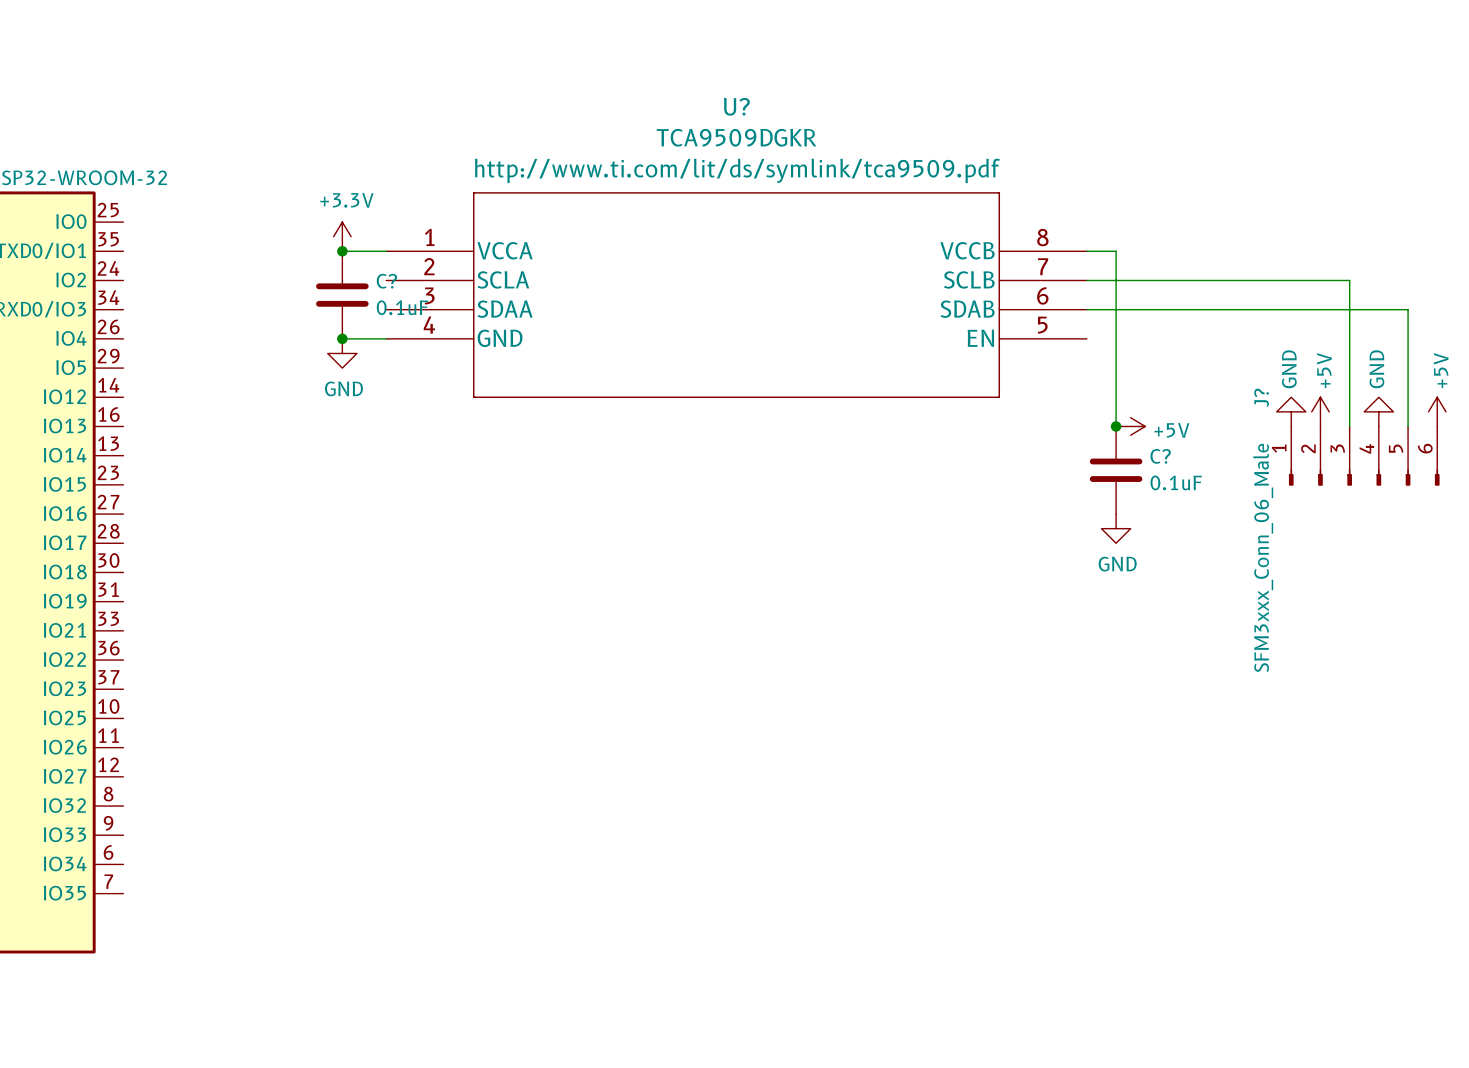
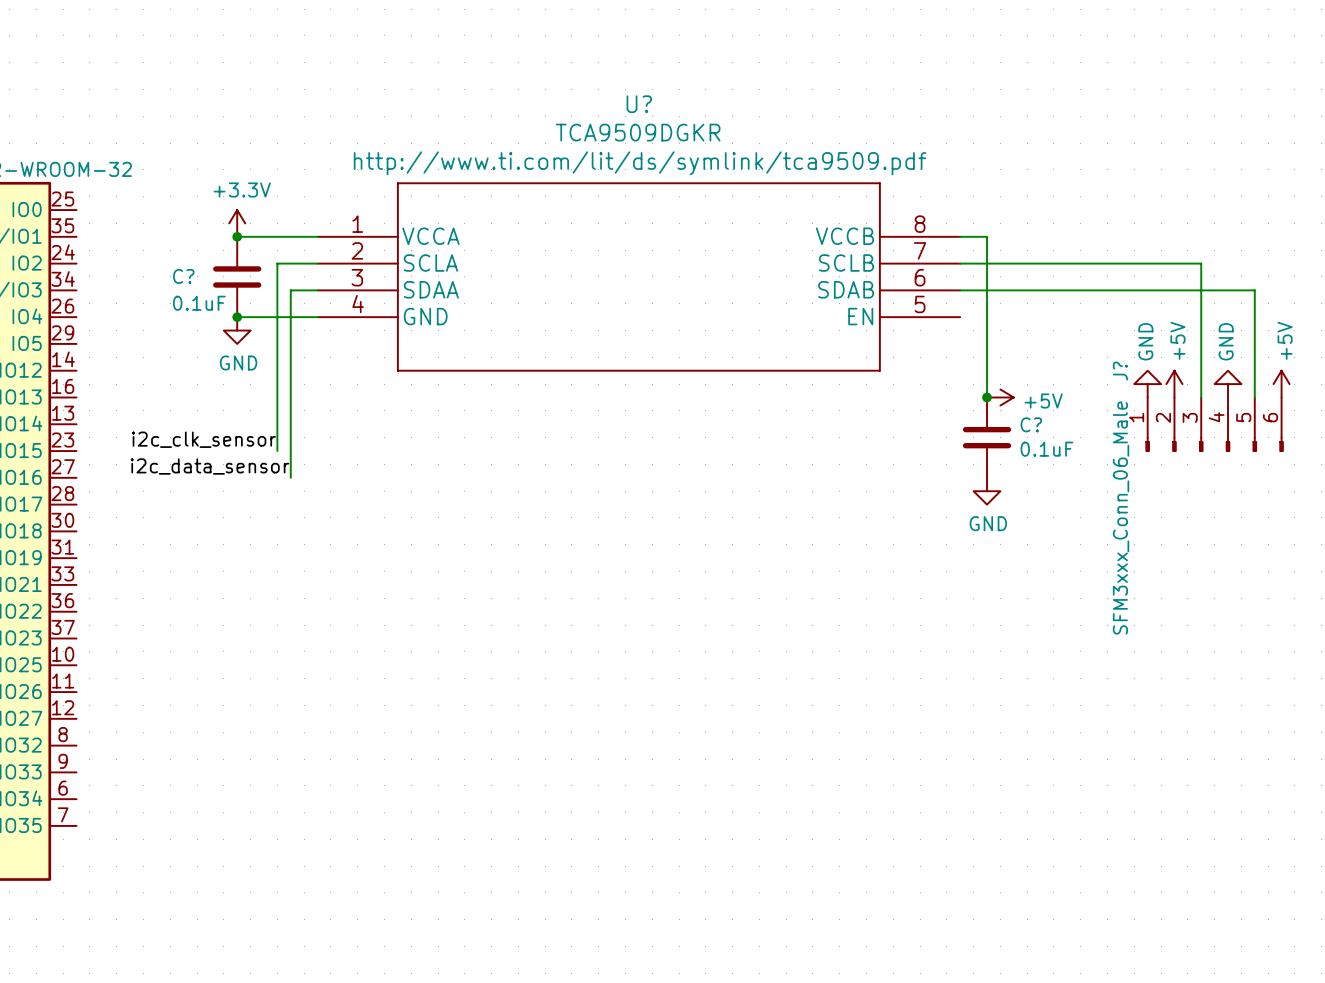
power symbol position: +3.3V (342, 236) -> +3.3V (237, 223)
wire: none -> (237, 236) (277, 236)
junction position: (342, 251) -> (237, 236)
wire: none -> (317, 263) (277, 263) (277, 451)
C? name position: C? (386, 281) -> C? (183, 276)
C? position: (342, 295) -> (237, 276)
C? value position: 0.1uF (402, 307) -> 0.1uF (199, 303)
wire: none -> (317, 290) (290, 290) (290, 477)
wire: none -> (237, 317) (277, 317)
junction position: (342, 338) -> (237, 317)
power symbol position: GND (342, 353) -> GND (237, 330)
label: none -> i2c_clk_sensor (203, 439)
label: none -> i2c_data_sensor (210, 466)

